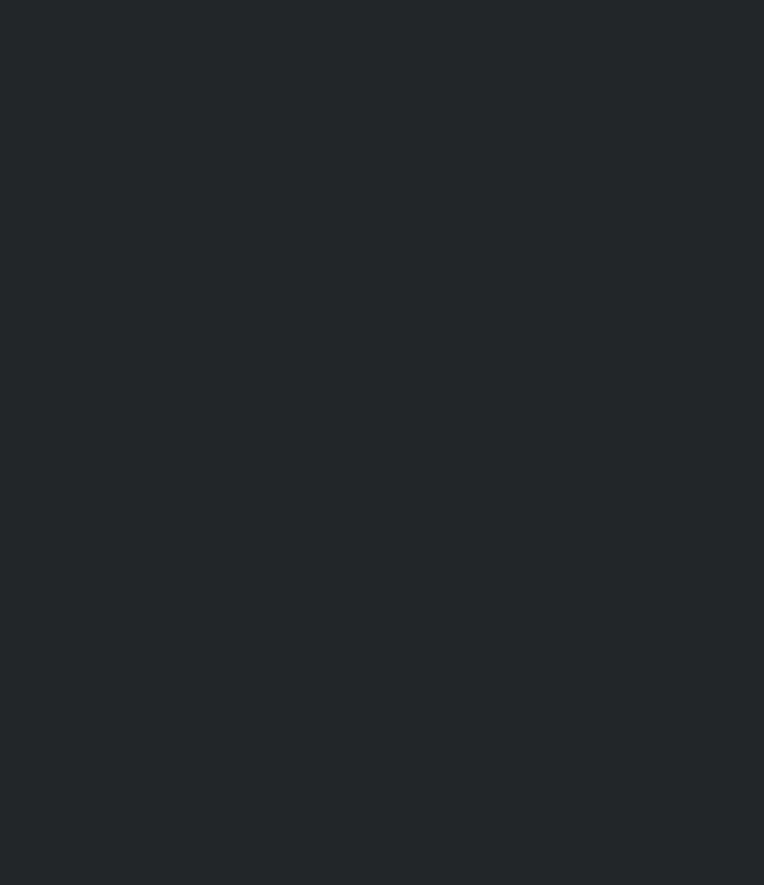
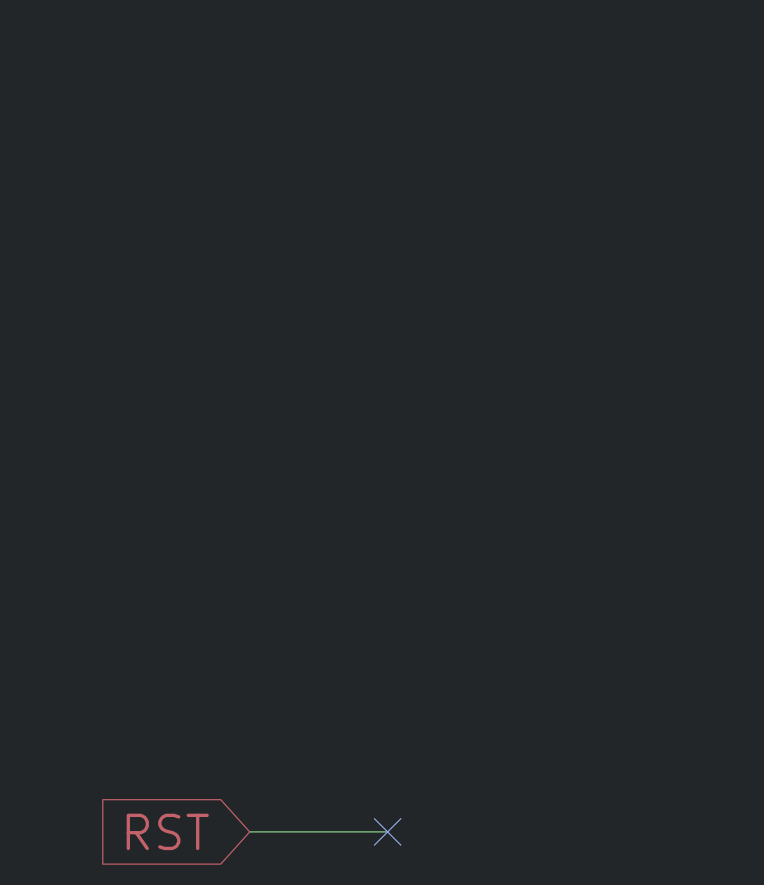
global label: none -> RST (167, 831)
wire: none -> (249, 831) (387, 831)
no-connect mark: none -> (387, 831)

